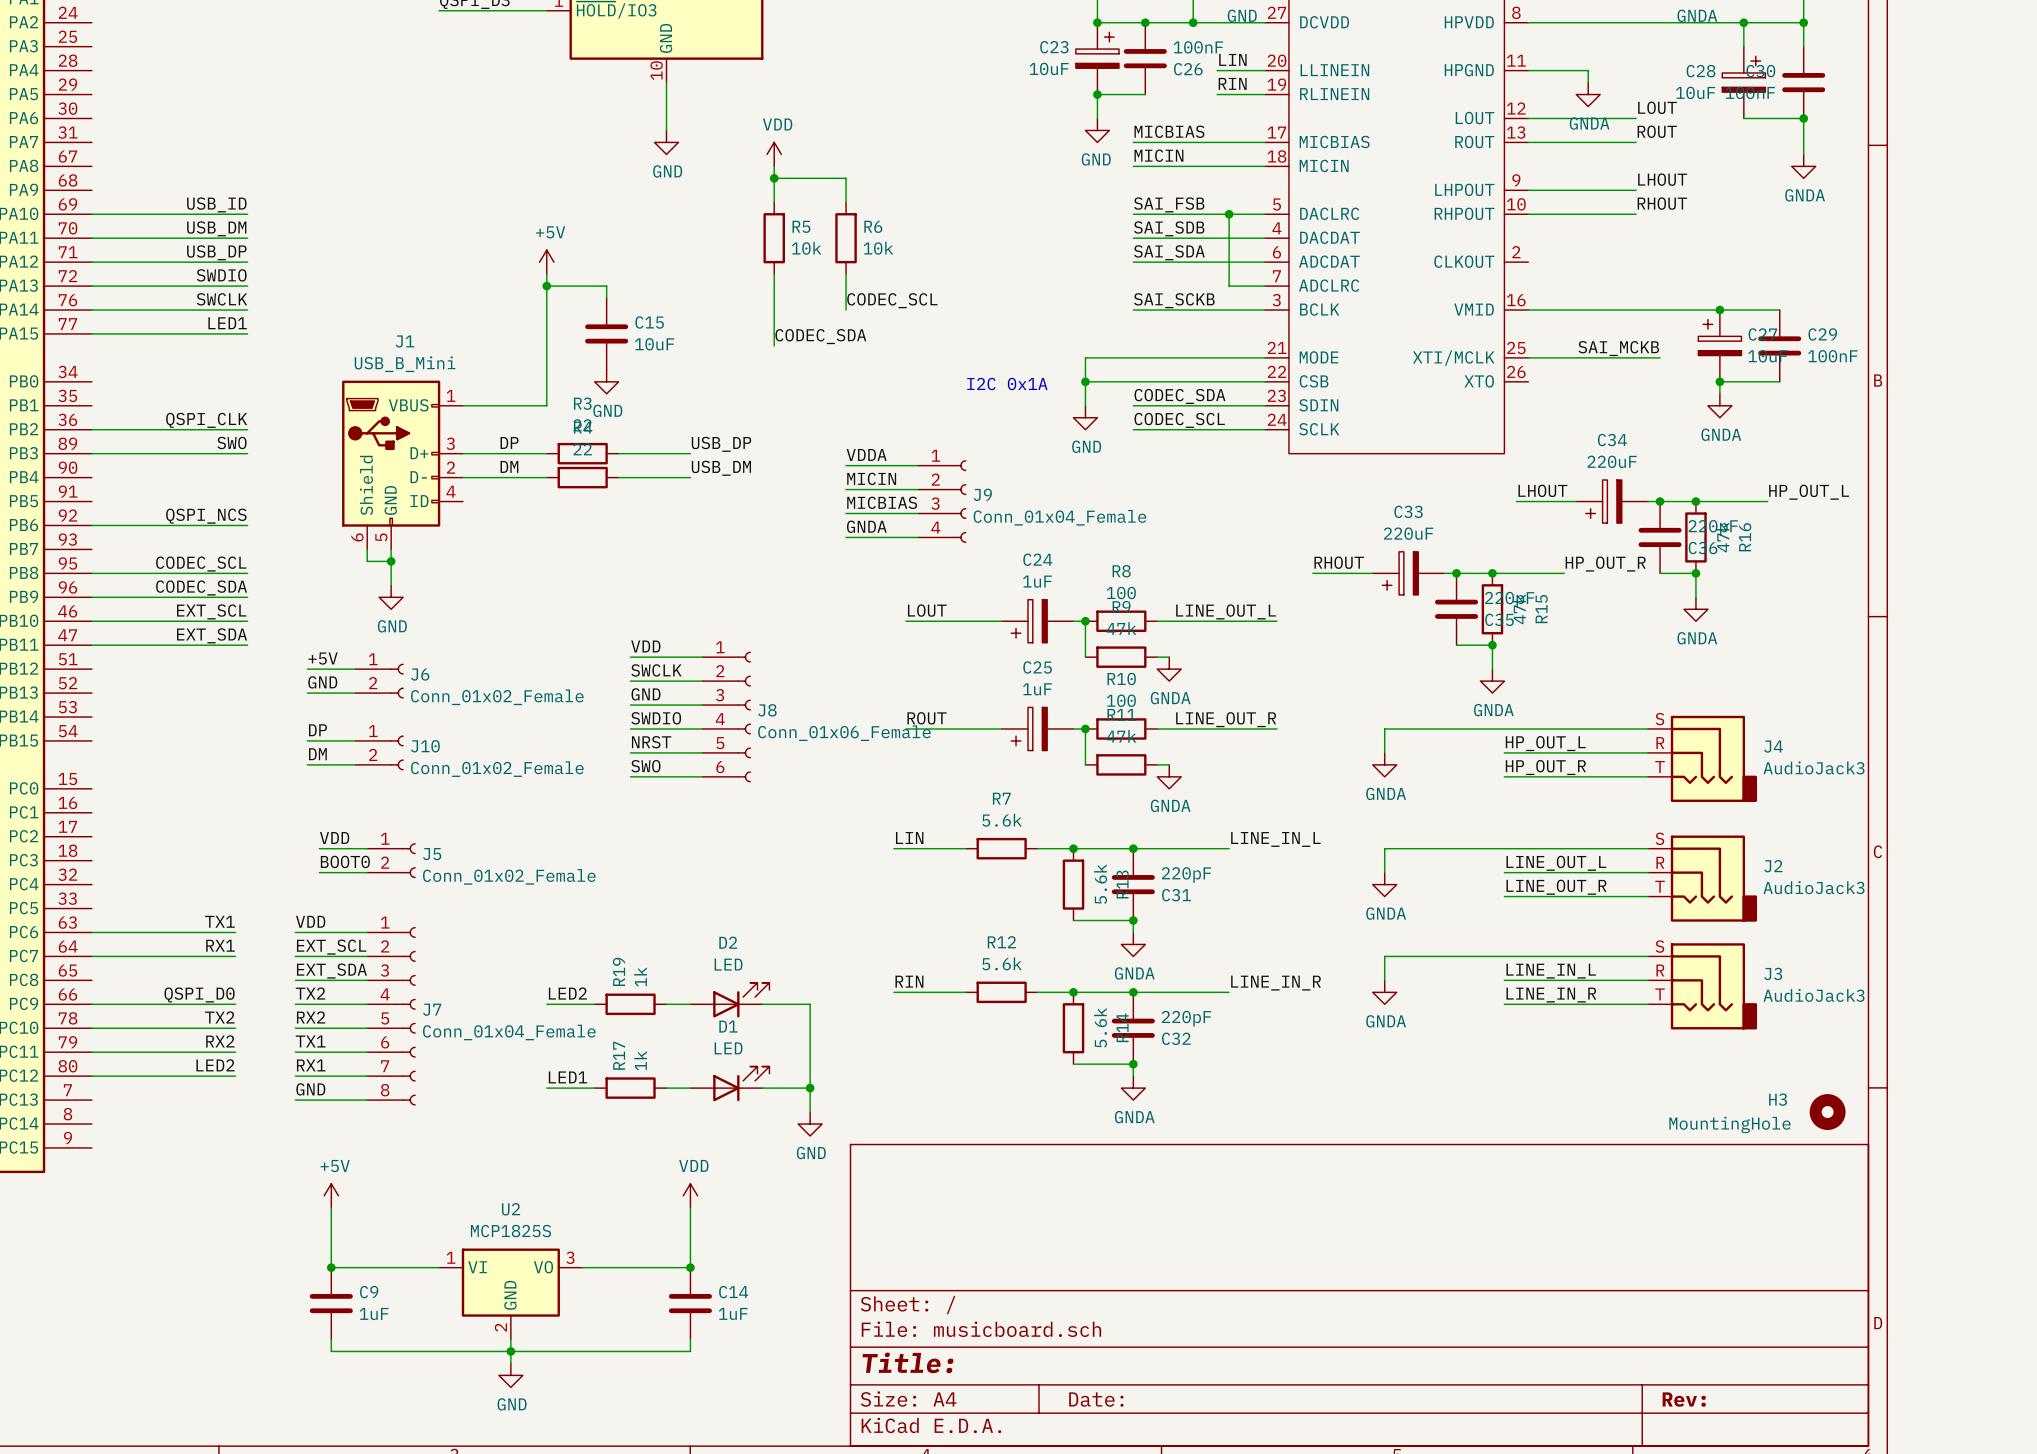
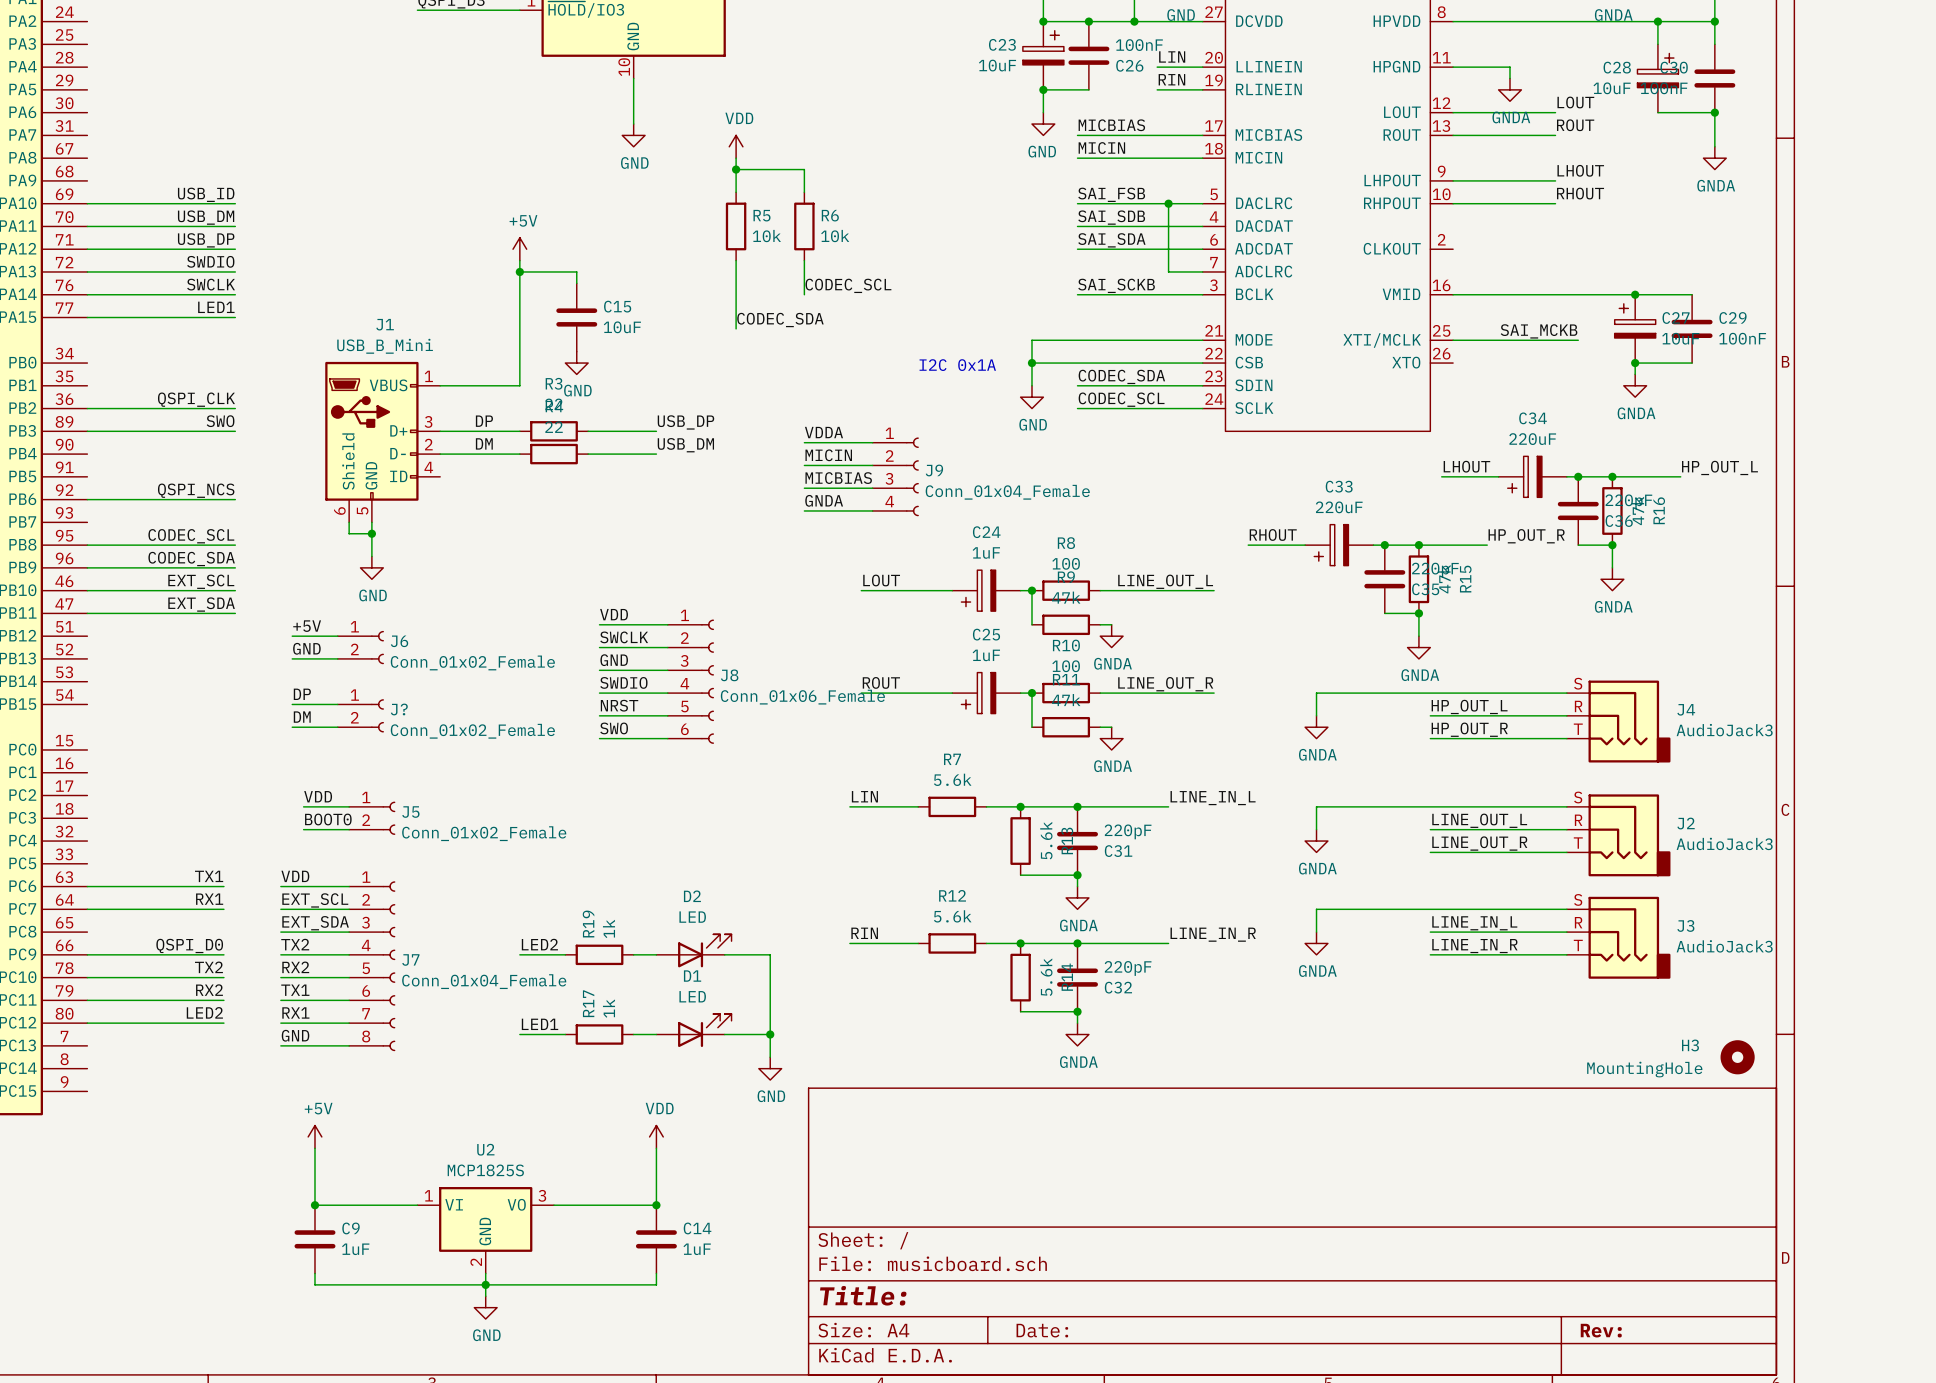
J10 name: J10 (425, 746) -> J? (399, 709)

